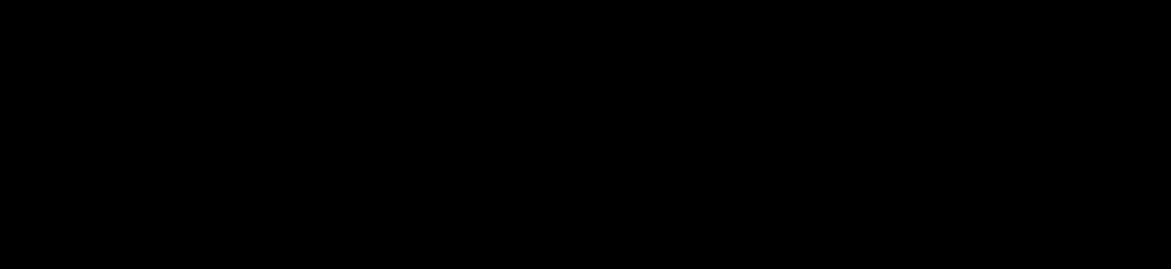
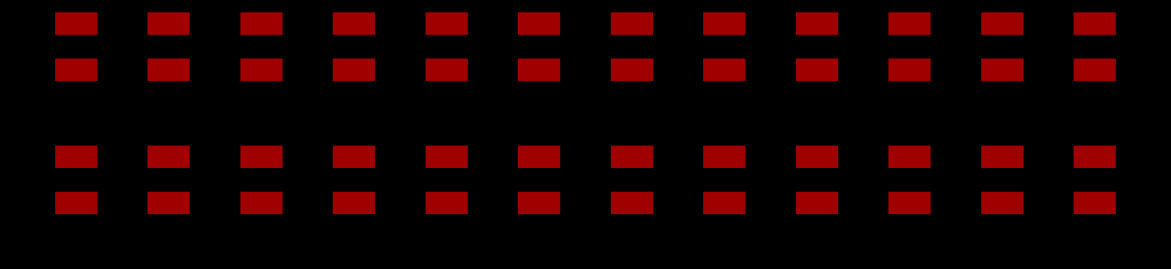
part: none -> (122, 46)
part: none -> (307, 46)
part: none -> (492, 46)
part: none -> (678, 46)
part: none -> (863, 46)
part: none -> (1048, 46)
part: none -> (122, 179)
part: none -> (307, 179)
part: none -> (492, 179)
part: none -> (678, 179)
part: none -> (863, 179)
part: none -> (1048, 179)

